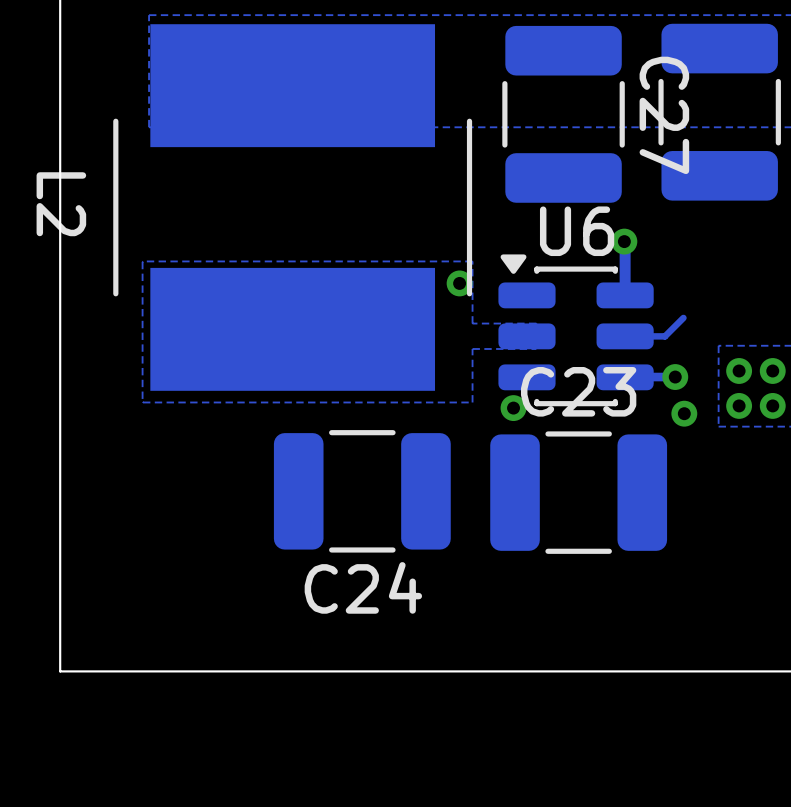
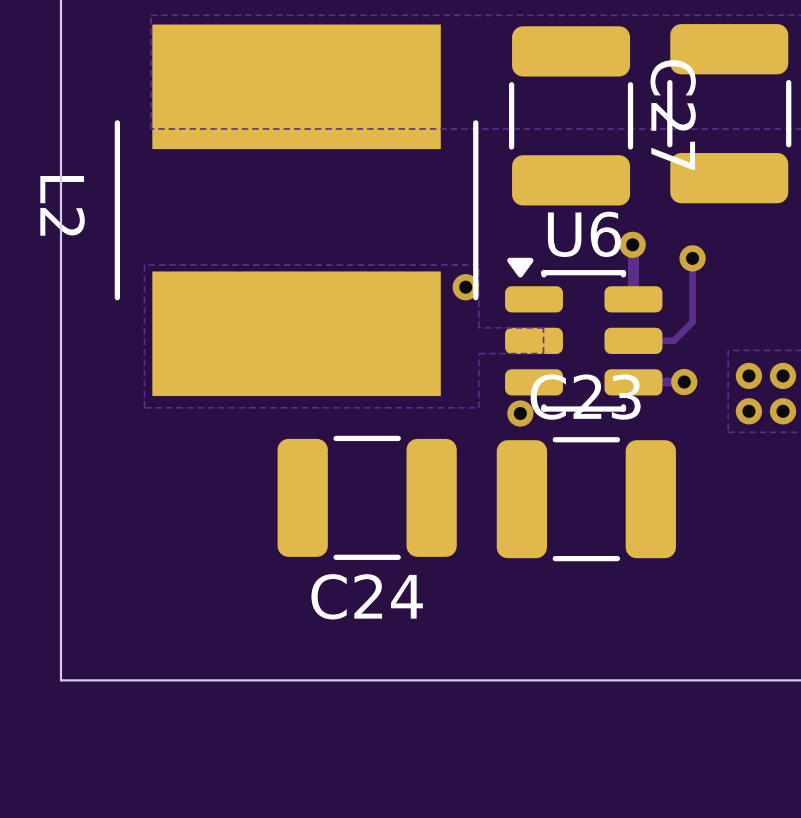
track: none -> (692, 258) (692, 322)
via position: (684, 413) -> (692, 258)

